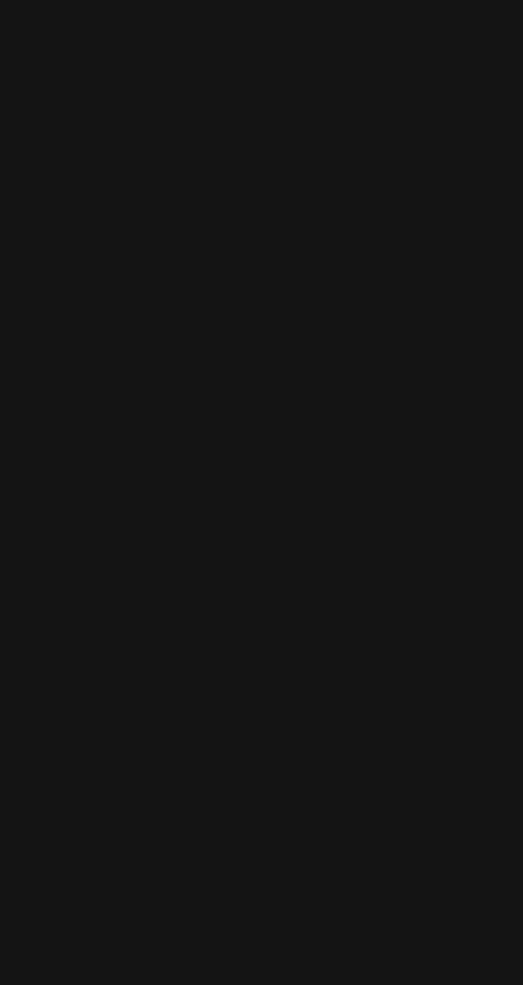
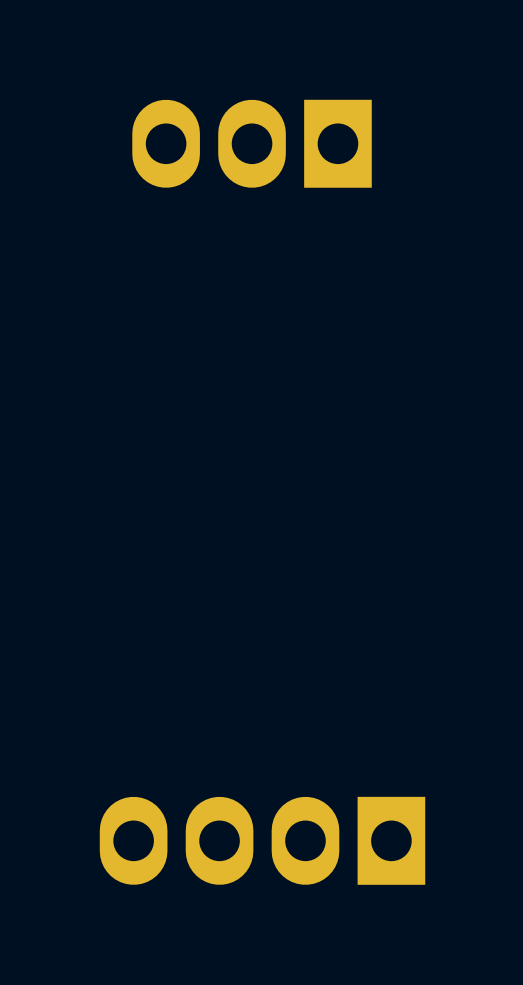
part: none -> (252, 143)
part: none -> (262, 840)

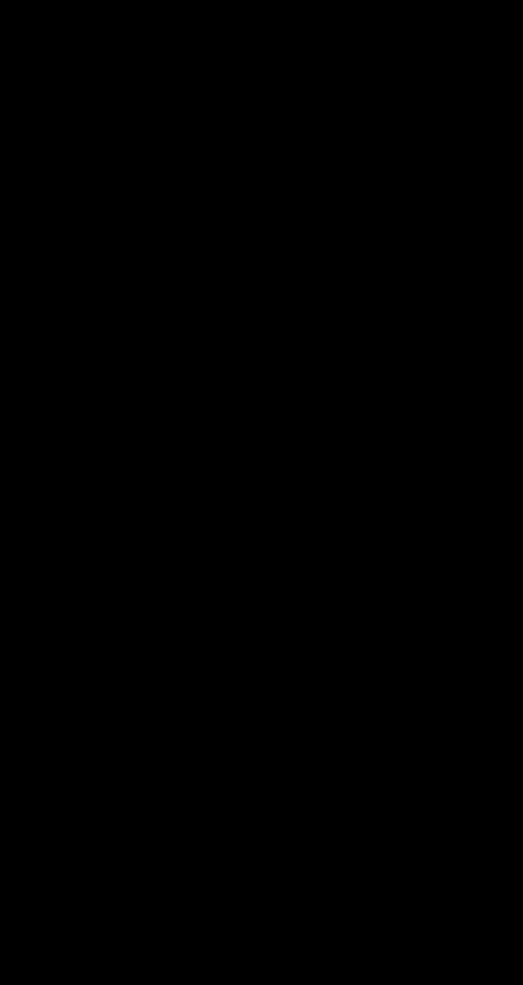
part: (252, 143) -> none
part: (262, 840) -> none

